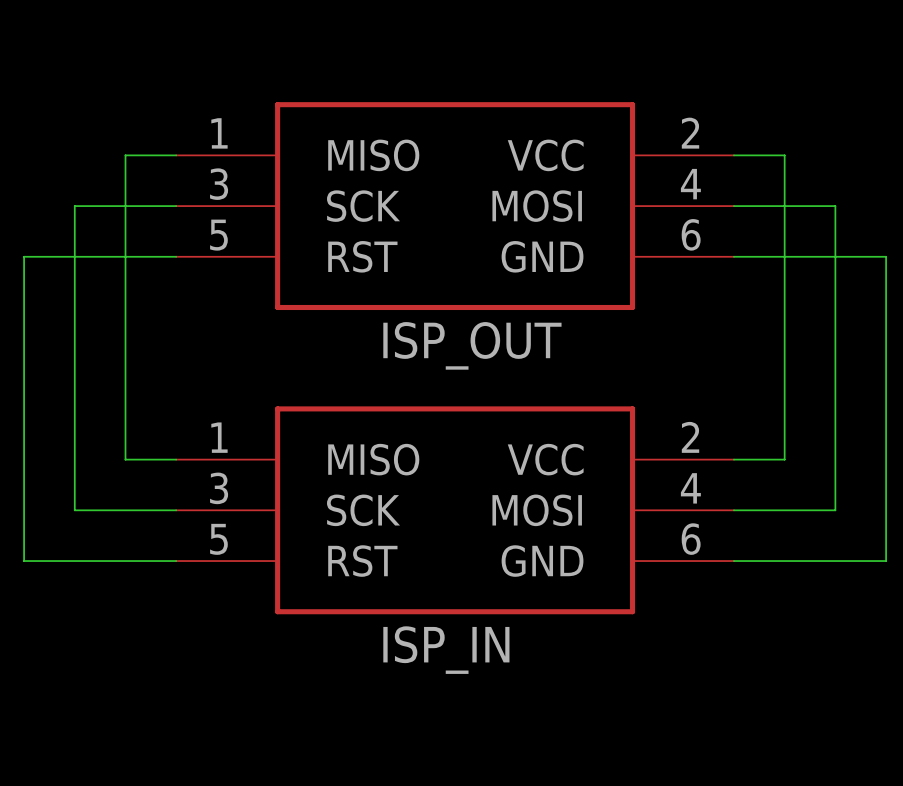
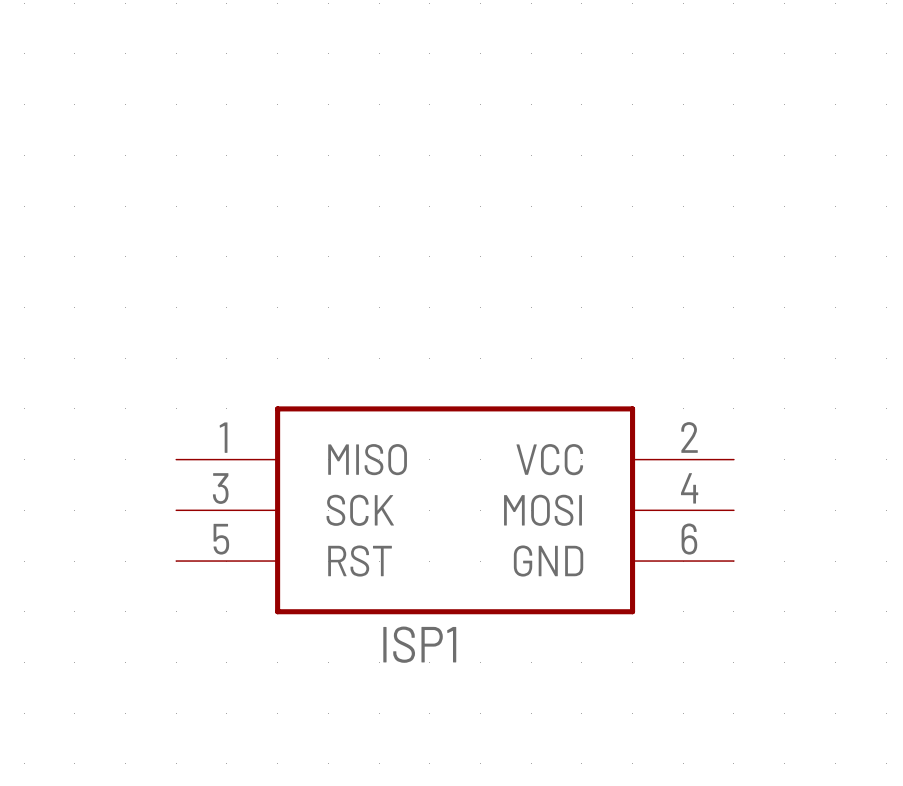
wire: (176, 155) (125, 155) (125, 459) (176, 459) -> none
wire: (733, 155) (784, 155) (784, 459) (733, 459) -> none
wire: (176, 206) (74, 206) (74, 510) (176, 510) -> none
ISP_OUT: (455, 206) -> none
wire: (733, 206) (835, 206) (835, 510) (733, 510) -> none
wire: (176, 256) (24, 256) (24, 561) (176, 561) -> none
wire: (733, 256) (886, 256) (886, 561) (733, 561) -> none
ISP_IN name: ISP_IN (446, 650) -> ISP1 (419, 644)

